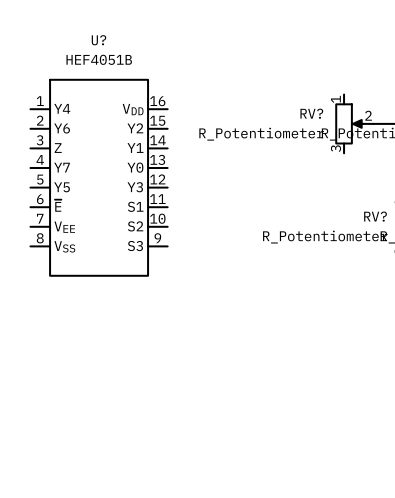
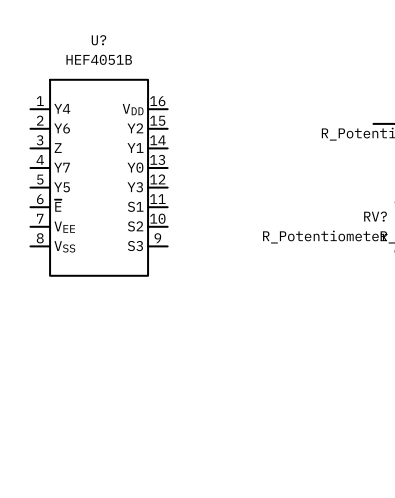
RV?: R_Potentiometer (354, 123) -> none

